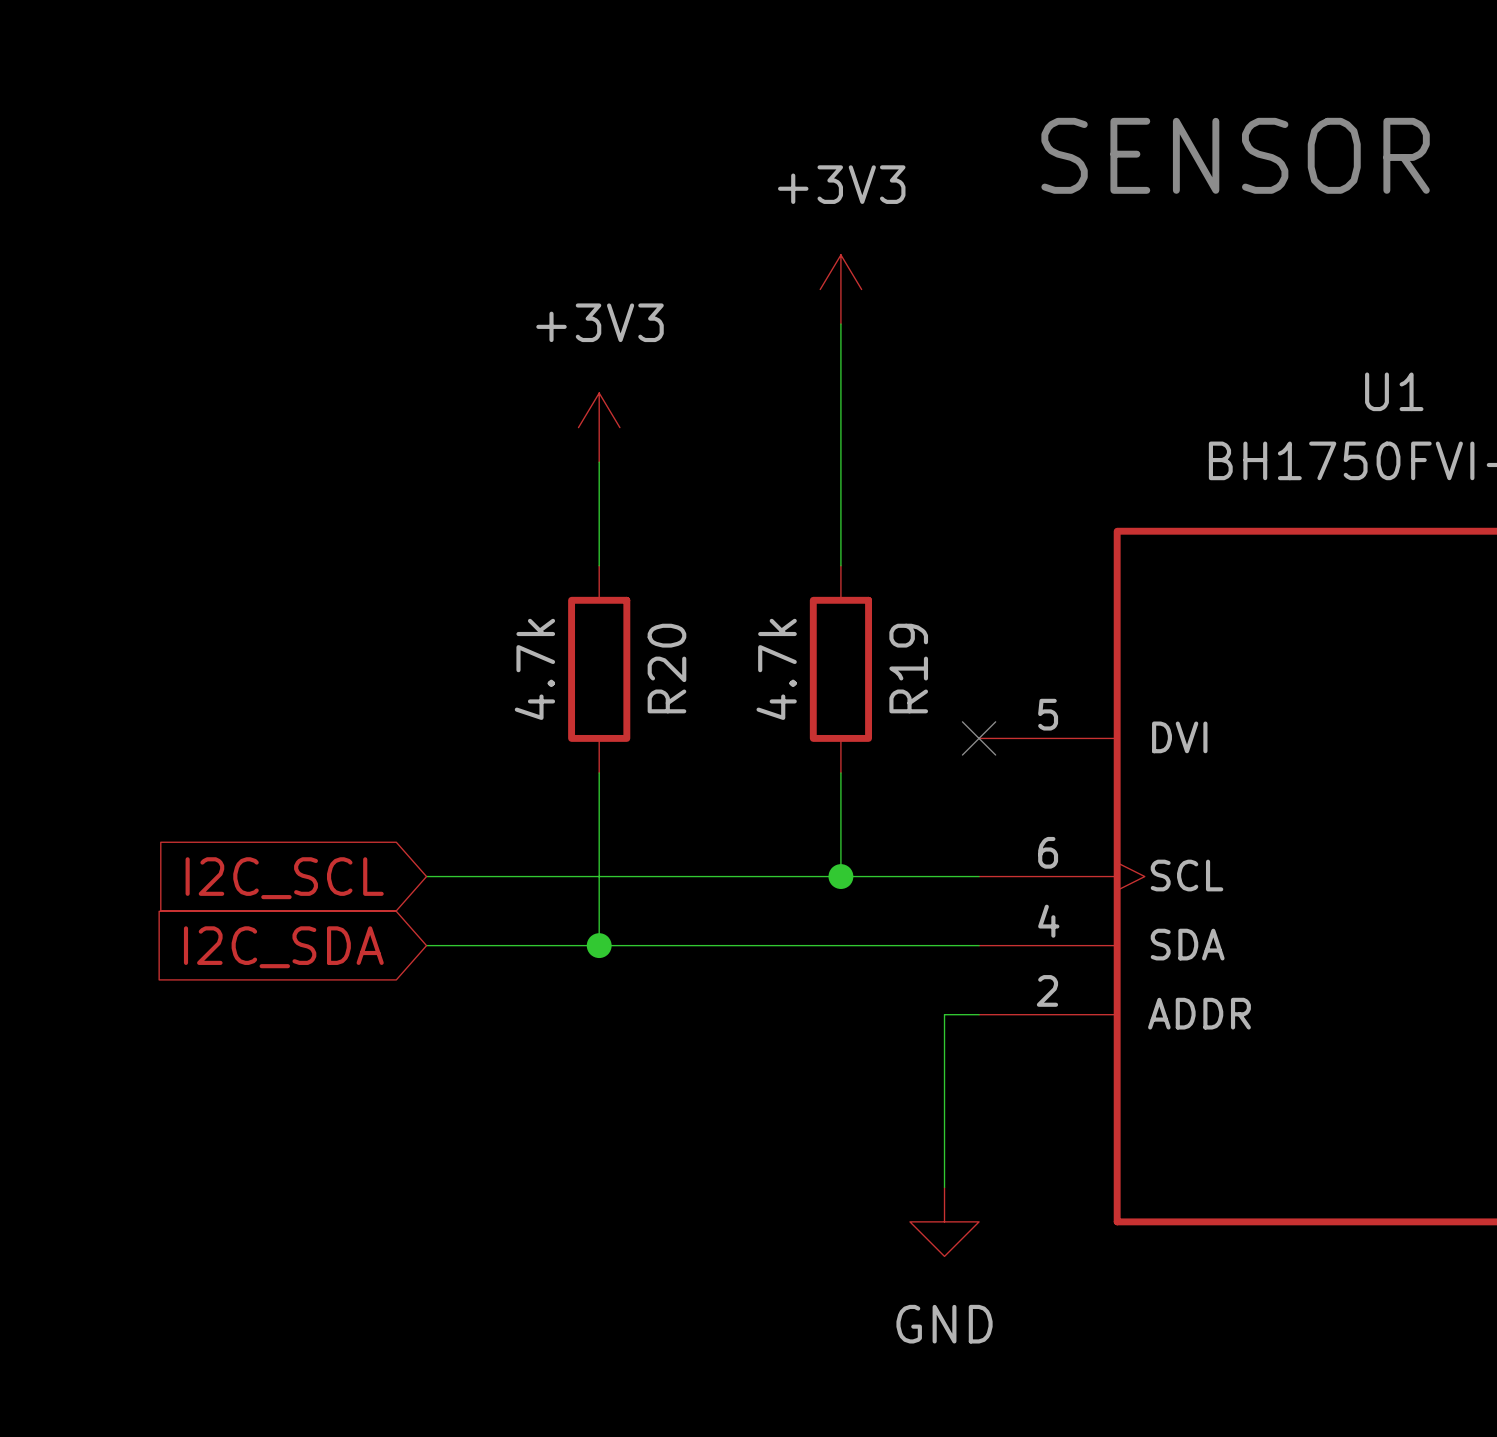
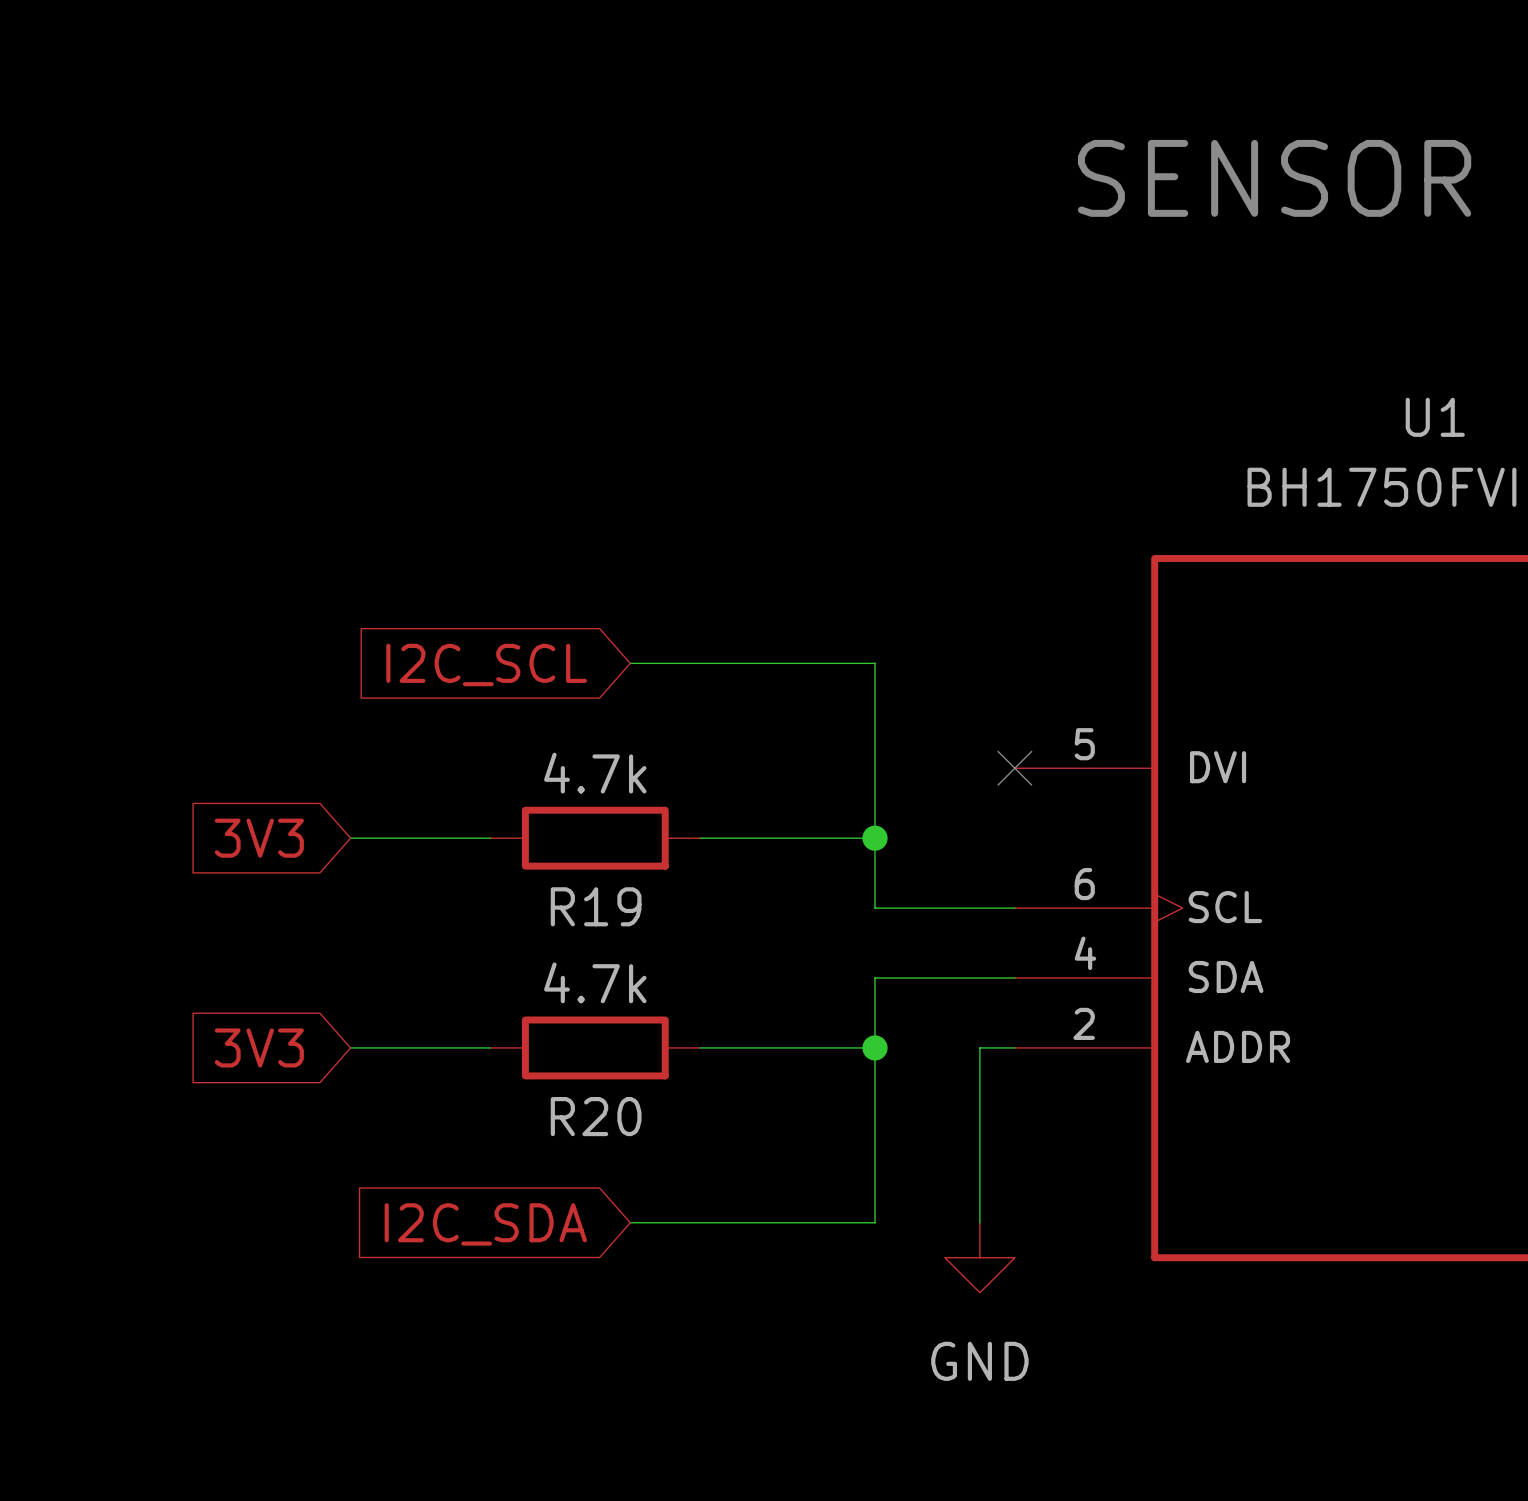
power symbol: +3V3 (840, 289) -> none
wire: (840, 324) (840, 565) -> none
power symbol: +3V3 (599, 427) -> none
wire: (599, 462) (599, 565) -> none
wire: none -> (630, 663) (875, 663) (875, 803)
R20 rotation: 0° (599, 669) -> 90° clockwise (595, 1047)
R20 position: (599, 669) -> (595, 1047)
R19 rotation: 0° (840, 669) -> 90° clockwise (595, 838)
R19 position: (840, 669) -> (595, 838)
wire: (599, 772) (599, 945) -> none
global label: none -> 3V3 (259, 838)
wire: none -> (350, 838) (490, 838)
wire: none -> (700, 838) (875, 838)
junction: none -> (875, 838)
wire: (426, 876) (840, 876) -> none
junction: (840, 876) -> none
global label position: I2C_SCL (284, 878) -> I2C_SCL (486, 665)
wire: (426, 945) (840, 945) -> (630, 1222) (875, 1222) (875, 978)
junction: (599, 945) -> none
global label position: I2C_SDA (283, 947) -> I2C_SDA (485, 1224)
global label: none -> 3V3 (259, 1047)
wire: none -> (350, 1047) (490, 1047)
wire: none -> (700, 1047) (875, 1047)
junction: none -> (875, 1047)

